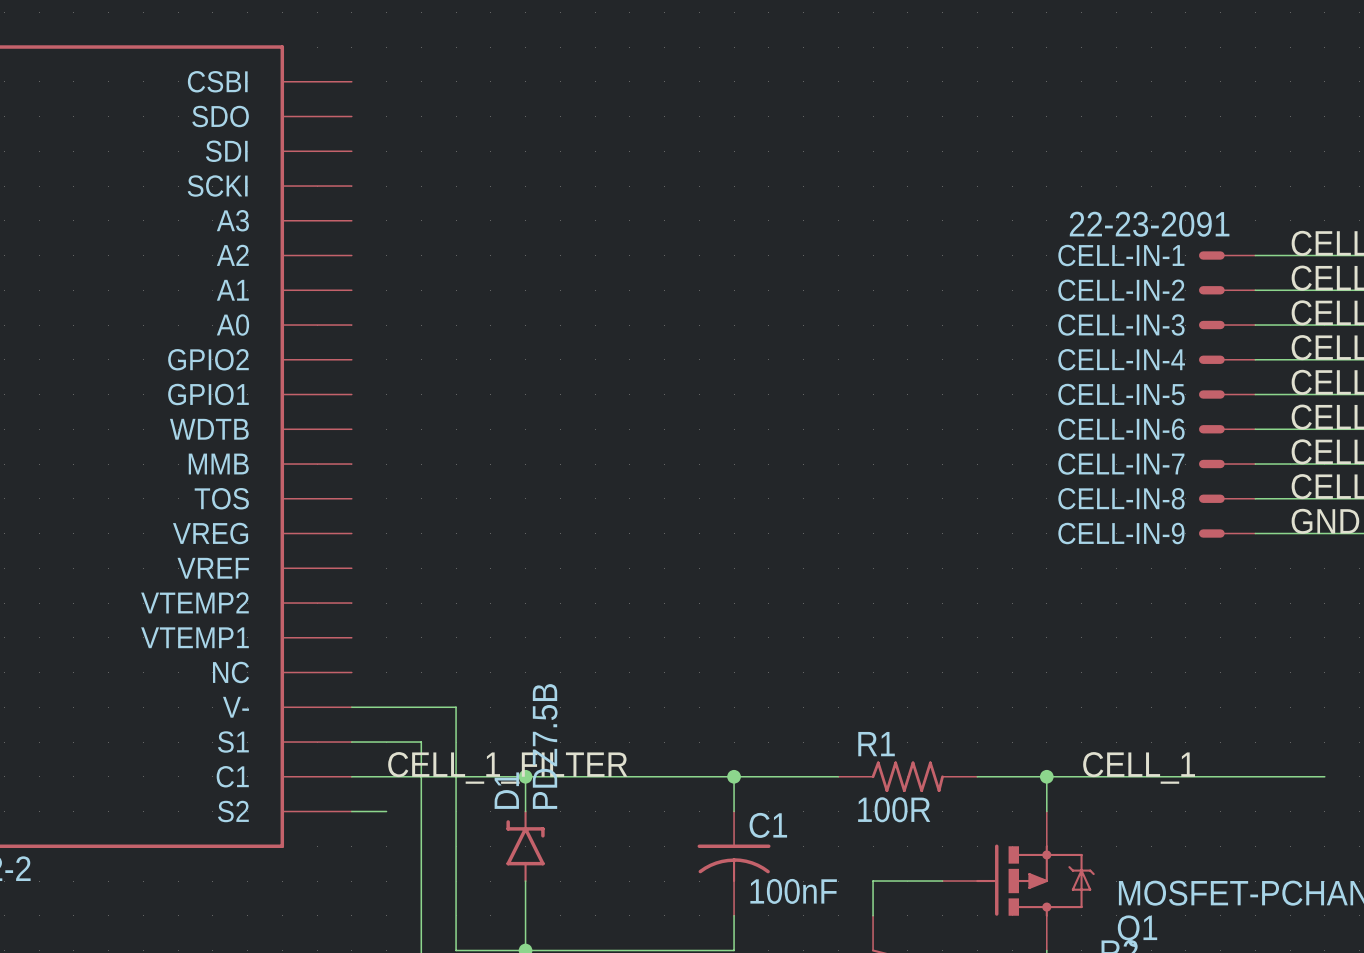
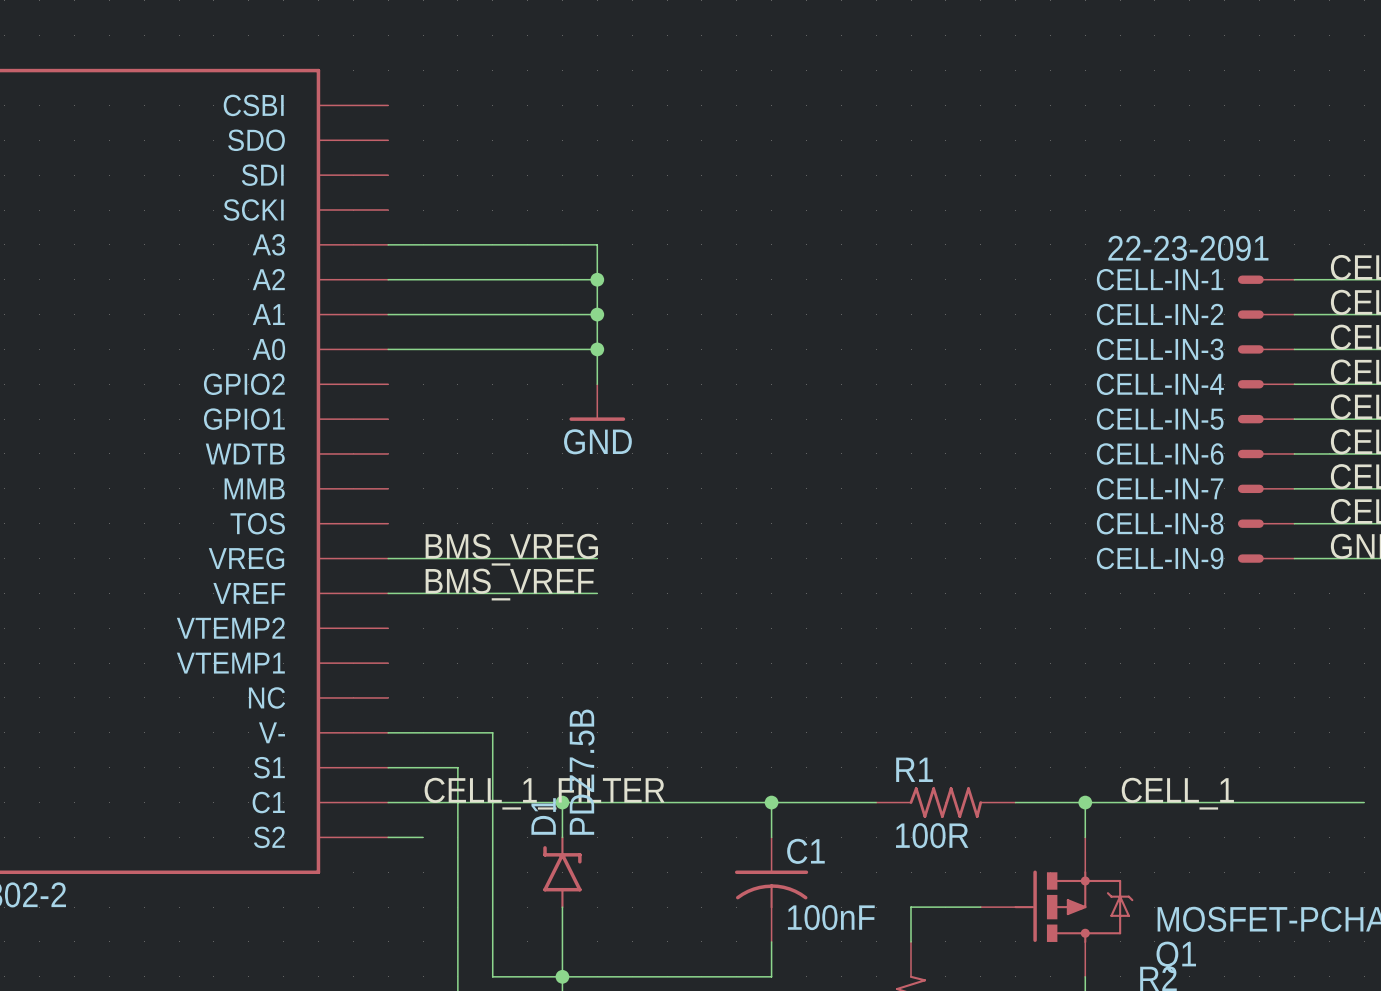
wire: none -> (388, 244) (597, 244) (597, 384)
wire: none -> (388, 279) (597, 279)
junction: none -> (597, 279)
wire: none -> (388, 314) (597, 314)
junction: none -> (597, 314)
wire: none -> (388, 349) (597, 349)
junction: none -> (597, 349)
power symbol: none -> GND (597, 402)
label: none -> BMS_VREG (511, 549)
wire: none -> (388, 558) (597, 558)
label: none -> BMS_VREF (509, 584)
wire: none -> (388, 593) (597, 593)

